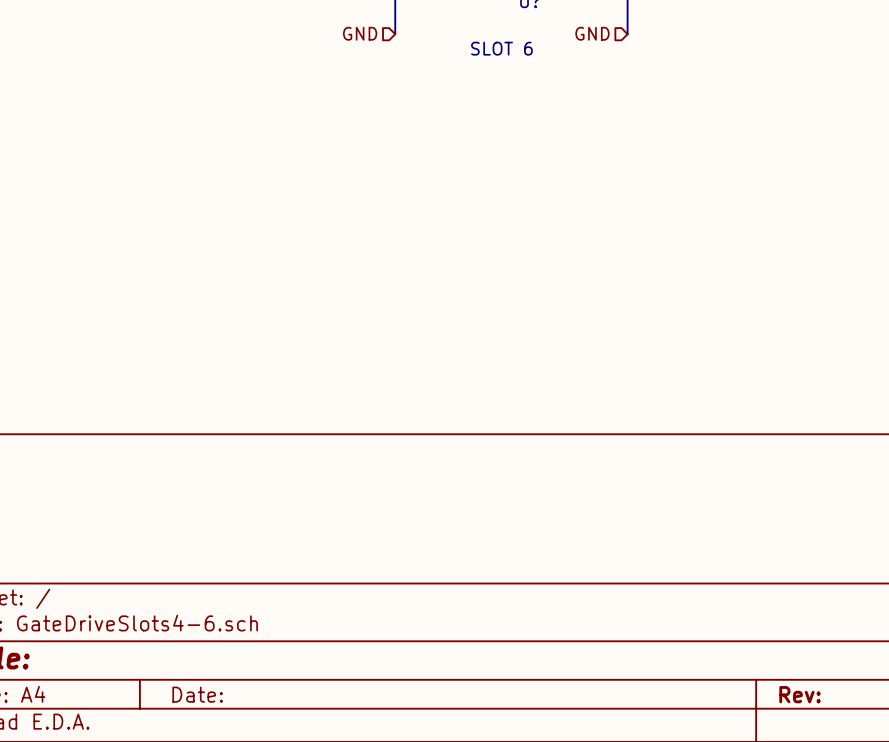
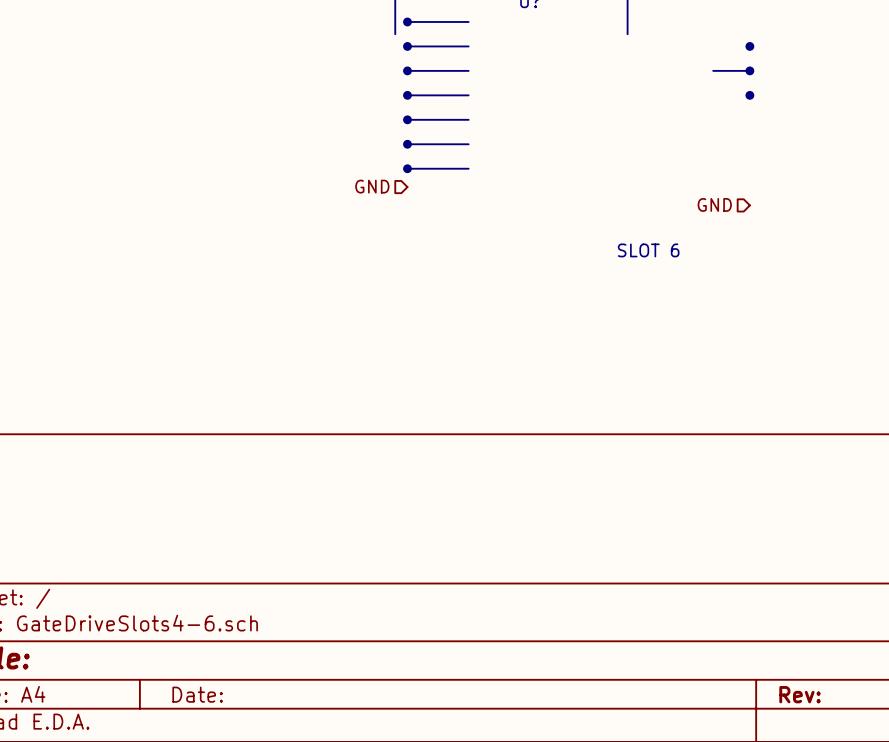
wire: none -> (407, 21) (468, 21)
junction: none -> (407, 21)
hierarchical label: GND (360, 33) -> none
hierarchical label: GND (592, 33) -> none
wire: none -> (407, 46) (468, 46)
junction: none -> (407, 46)
junction: none -> (749, 46)
text: SLOT 6 (501, 48) -> none
wire: none -> (407, 70) (468, 70)
junction: none -> (407, 70)
wire: none -> (713, 70) (749, 70)
junction: none -> (749, 70)
wire: none -> (407, 95) (468, 95)
junction: none -> (407, 95)
junction: none -> (749, 95)
wire: none -> (407, 119) (468, 119)
junction: none -> (407, 119)
wire: none -> (407, 144) (468, 144)
junction: none -> (407, 144)
wire: none -> (407, 168) (468, 168)
junction: none -> (407, 168)
hierarchical label: none -> GND (372, 186)
hierarchical label: none -> GND (714, 204)
text: none -> SLOT 6 (648, 250)

